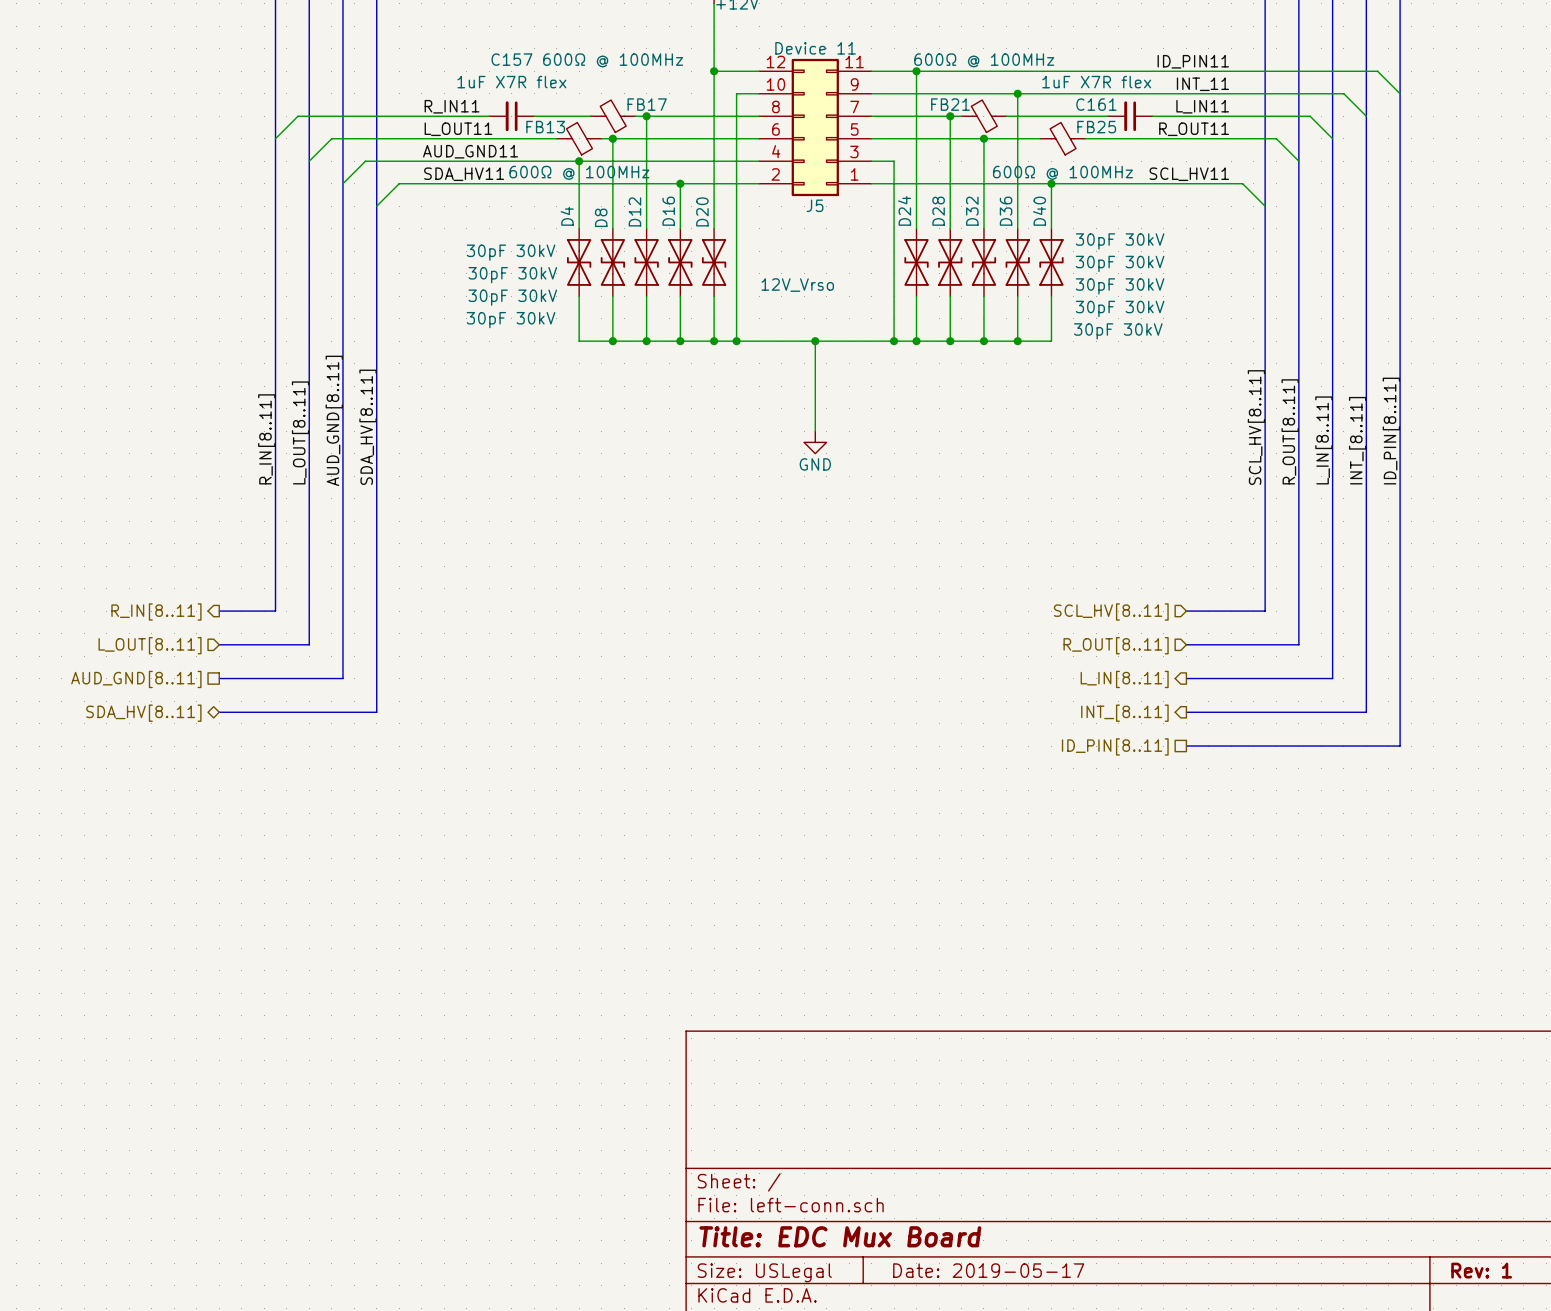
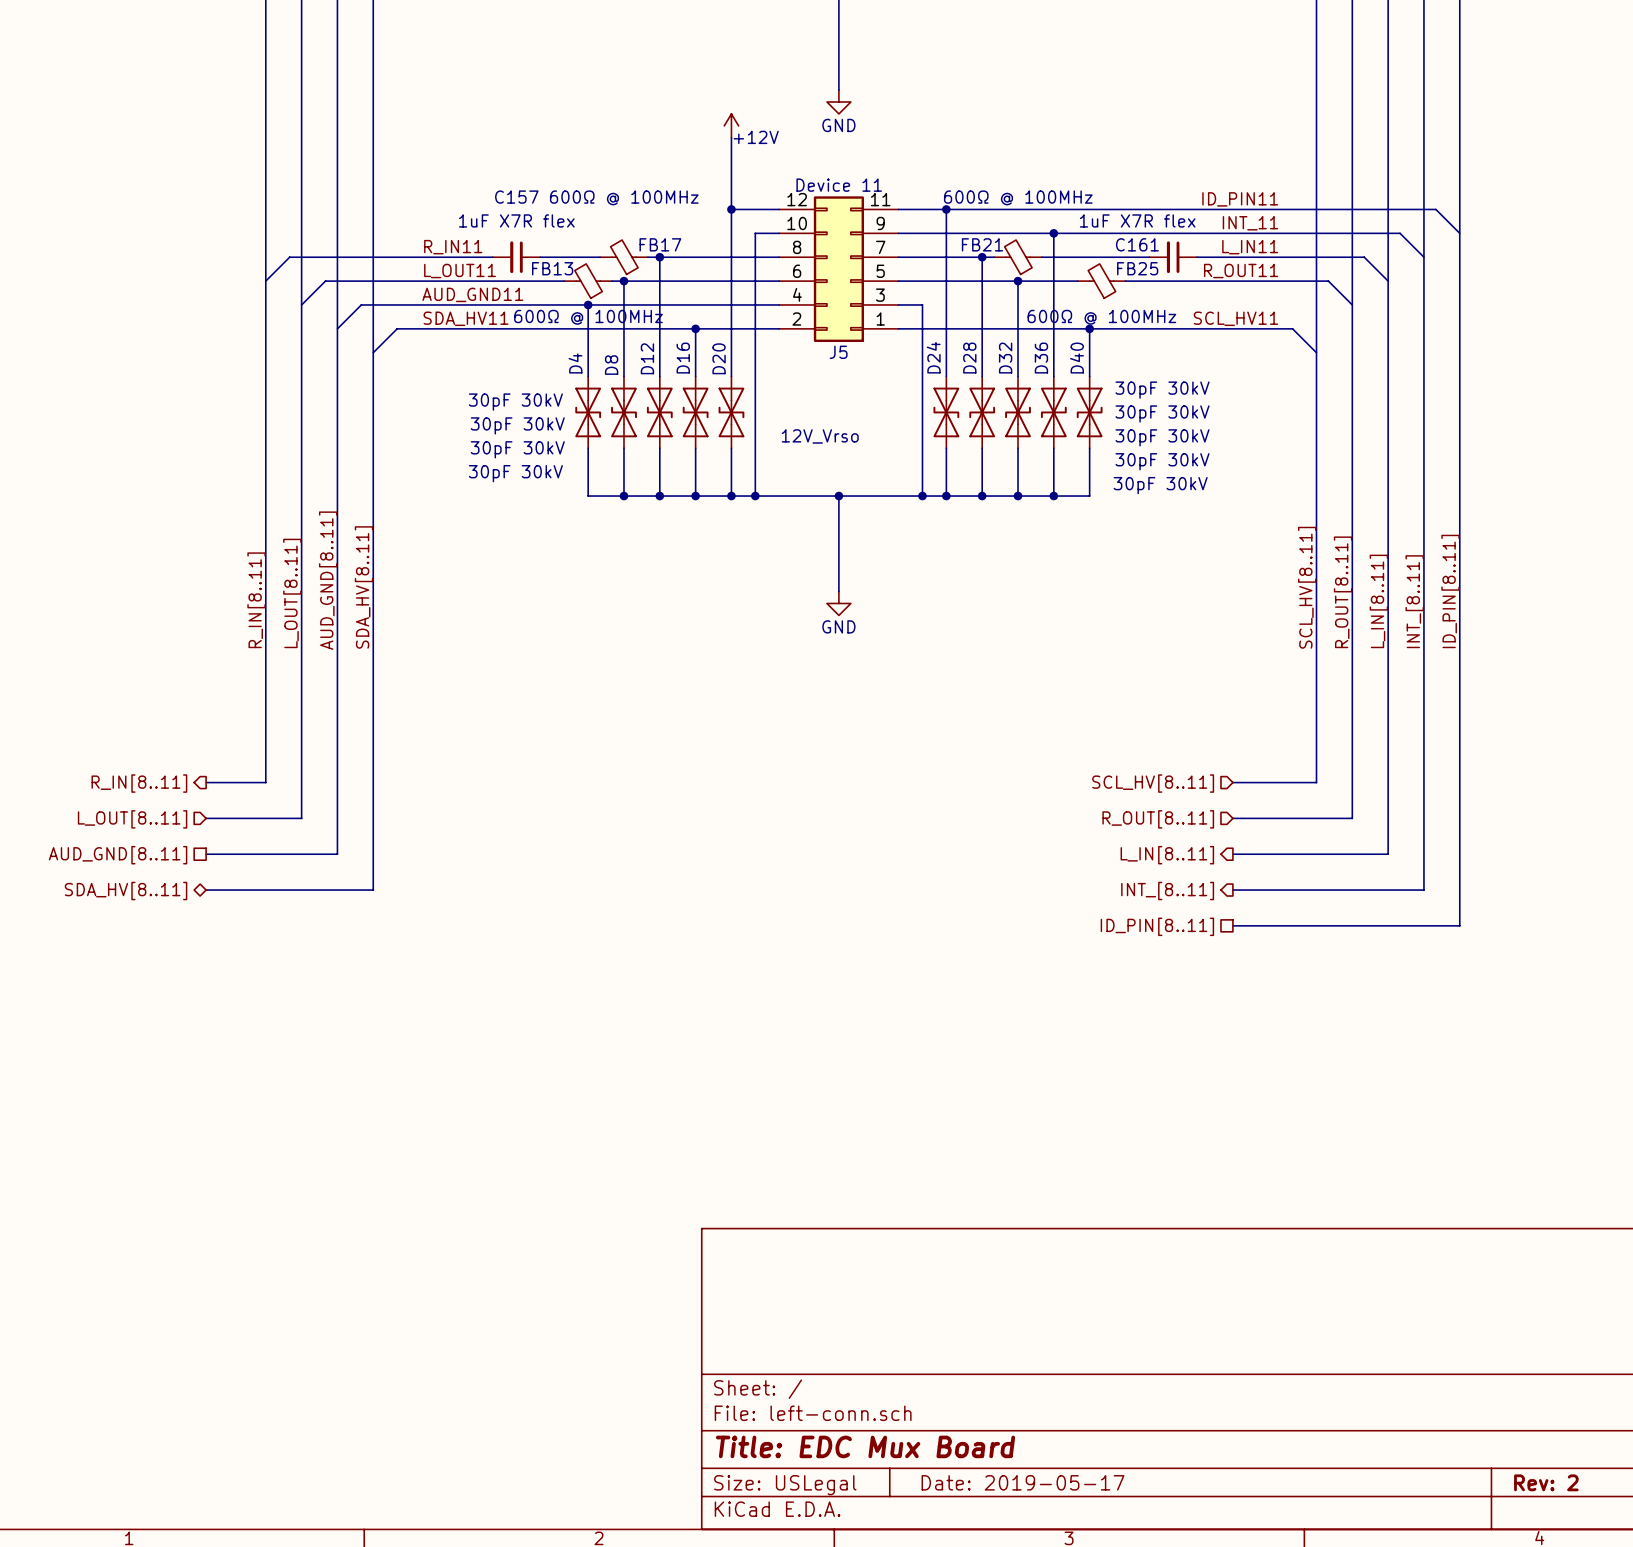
title block: Rev: 1 (1481, 1270) -> Rev: 2 (1546, 1482)

